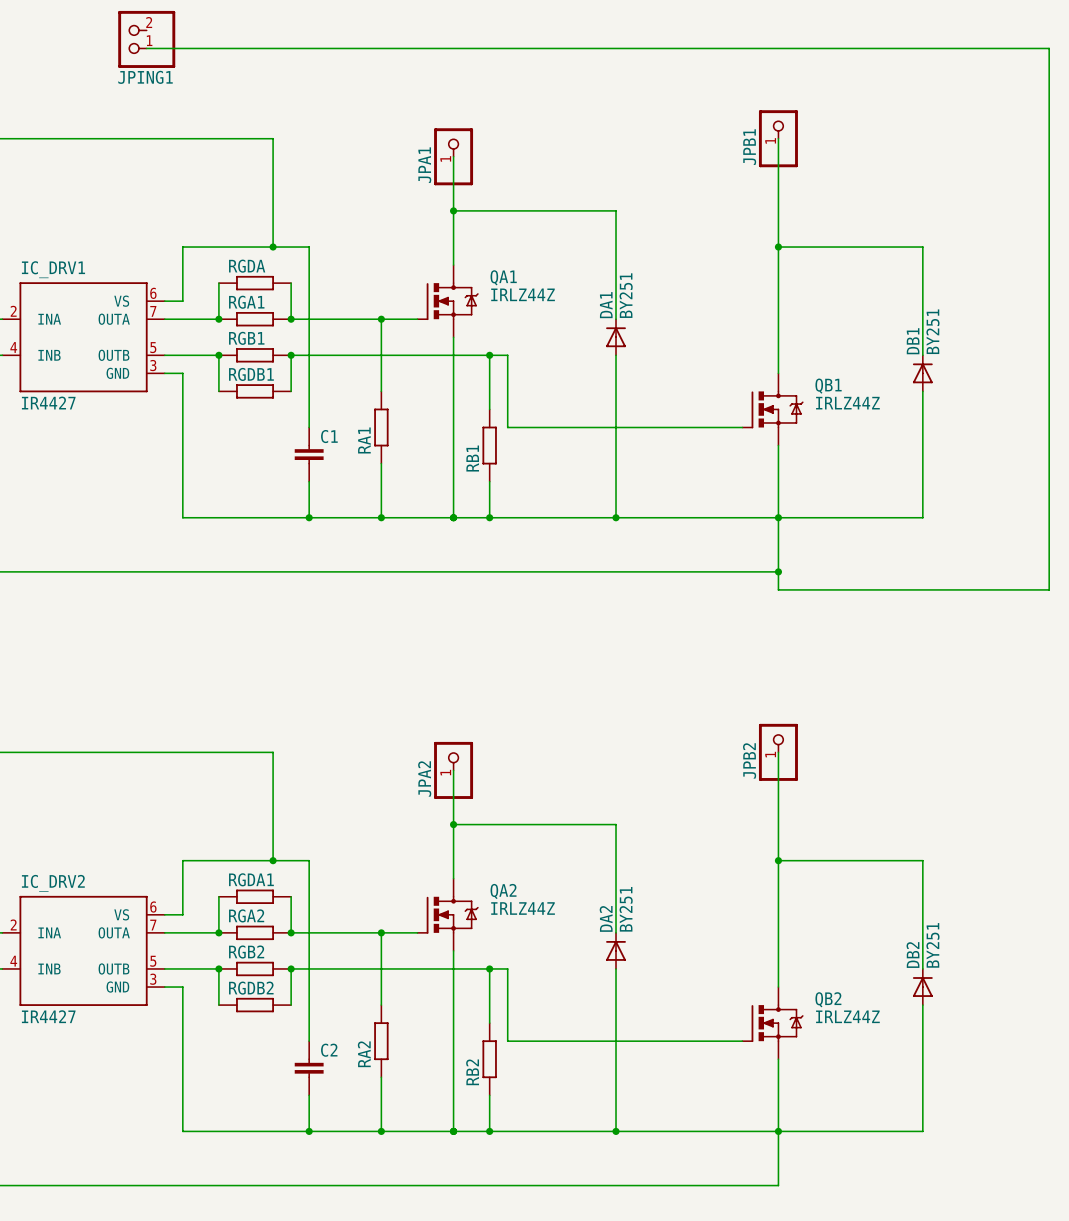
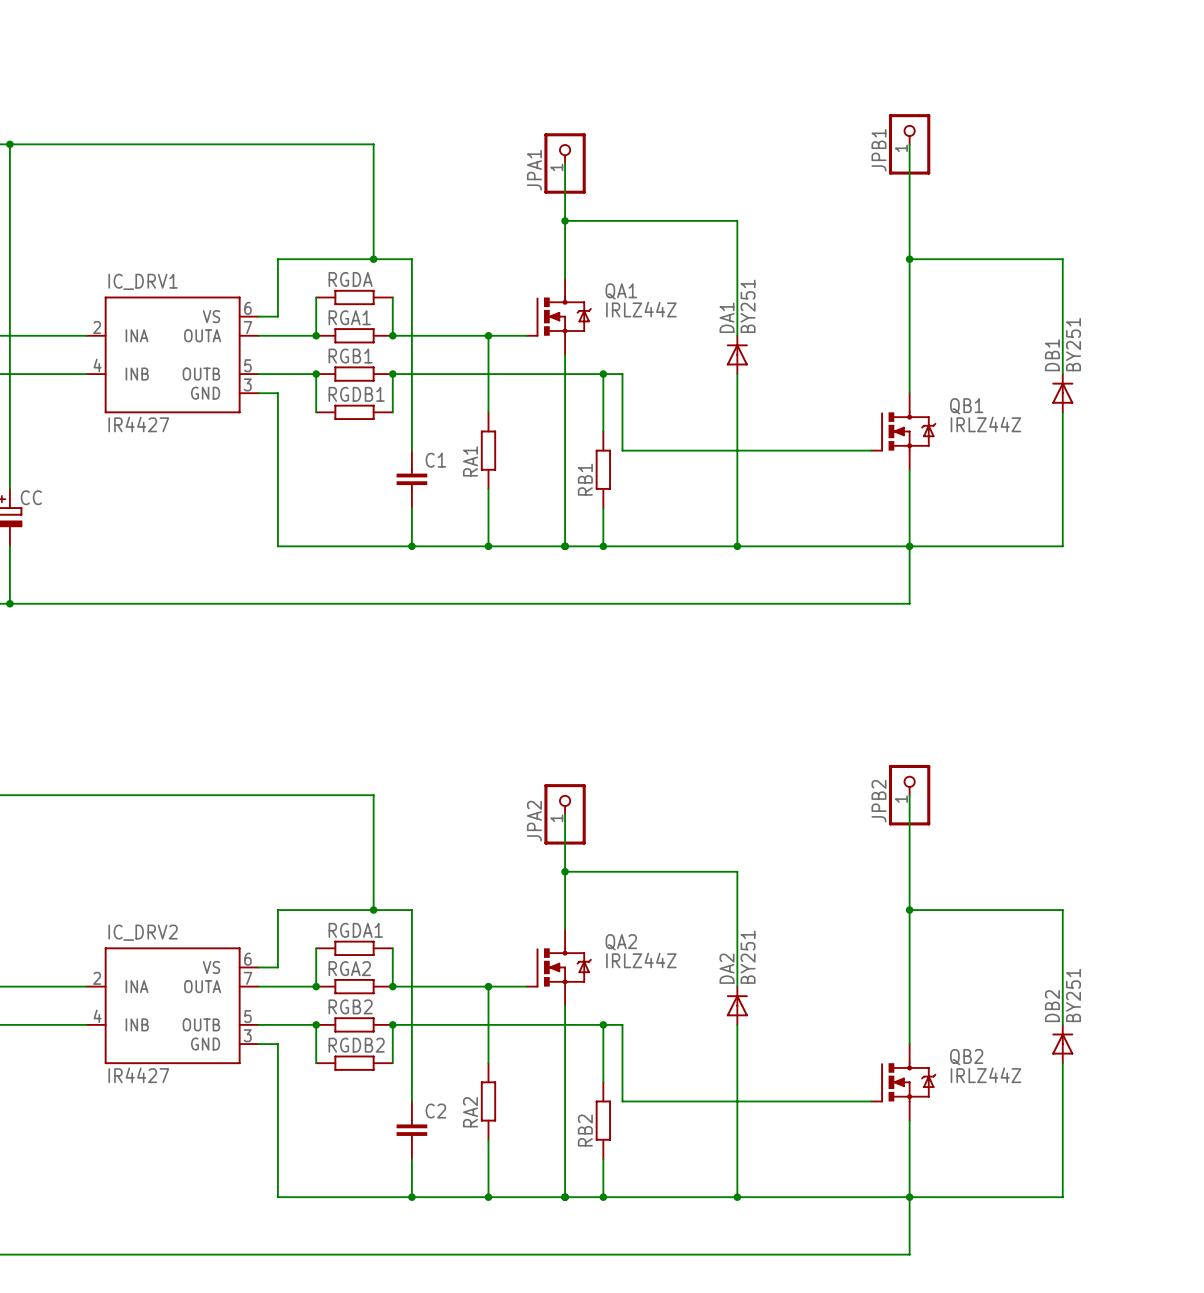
JPING1: (146, 39) -> none
wire: (146, 48) (1049, 48) (1049, 589) (778, 589) (778, 571) -> none
junction: (778, 571) -> none

